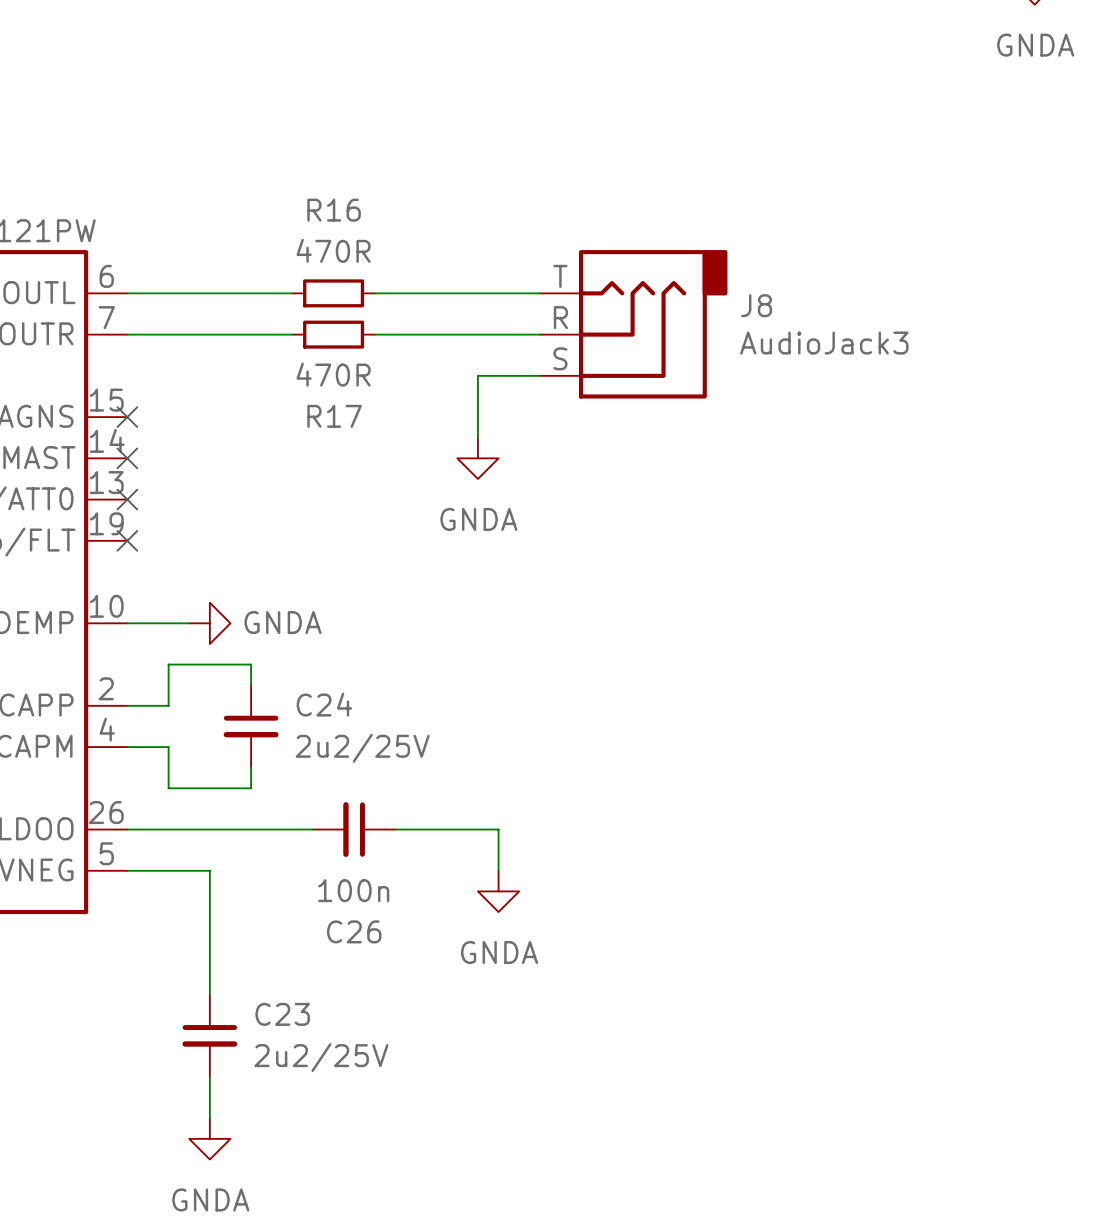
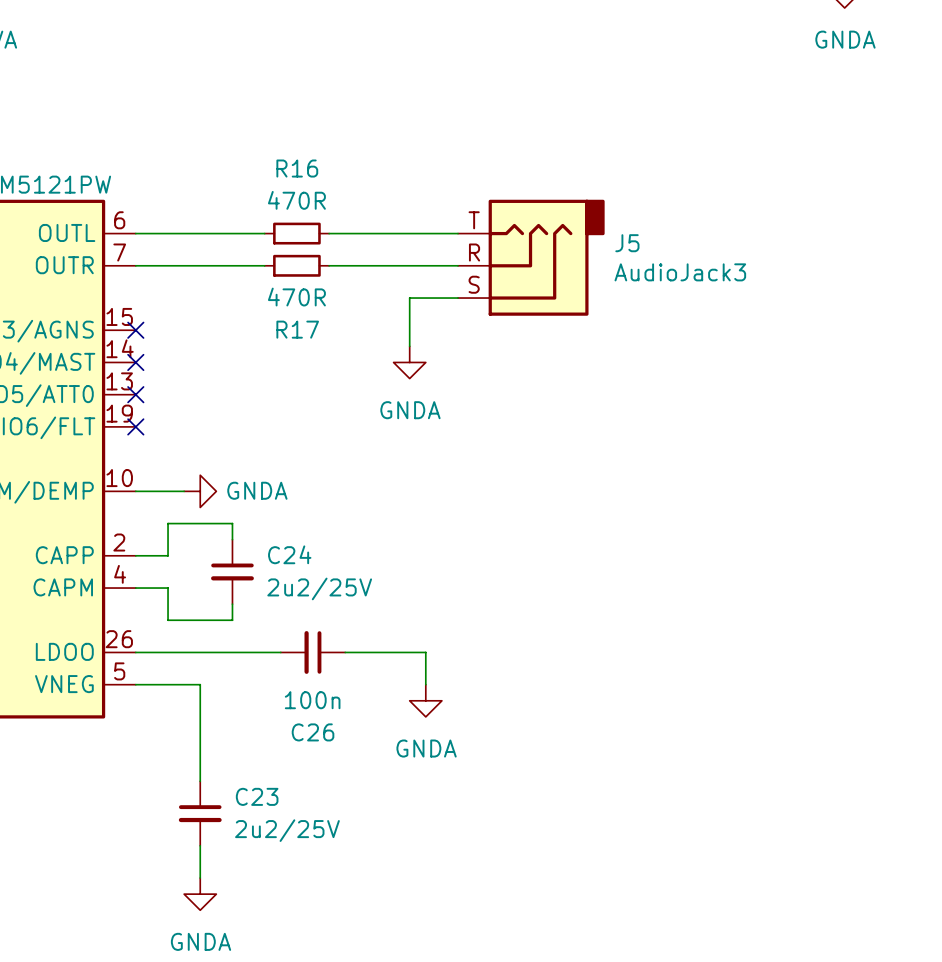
J8 name: J8 (756, 305) -> J5 (627, 243)

